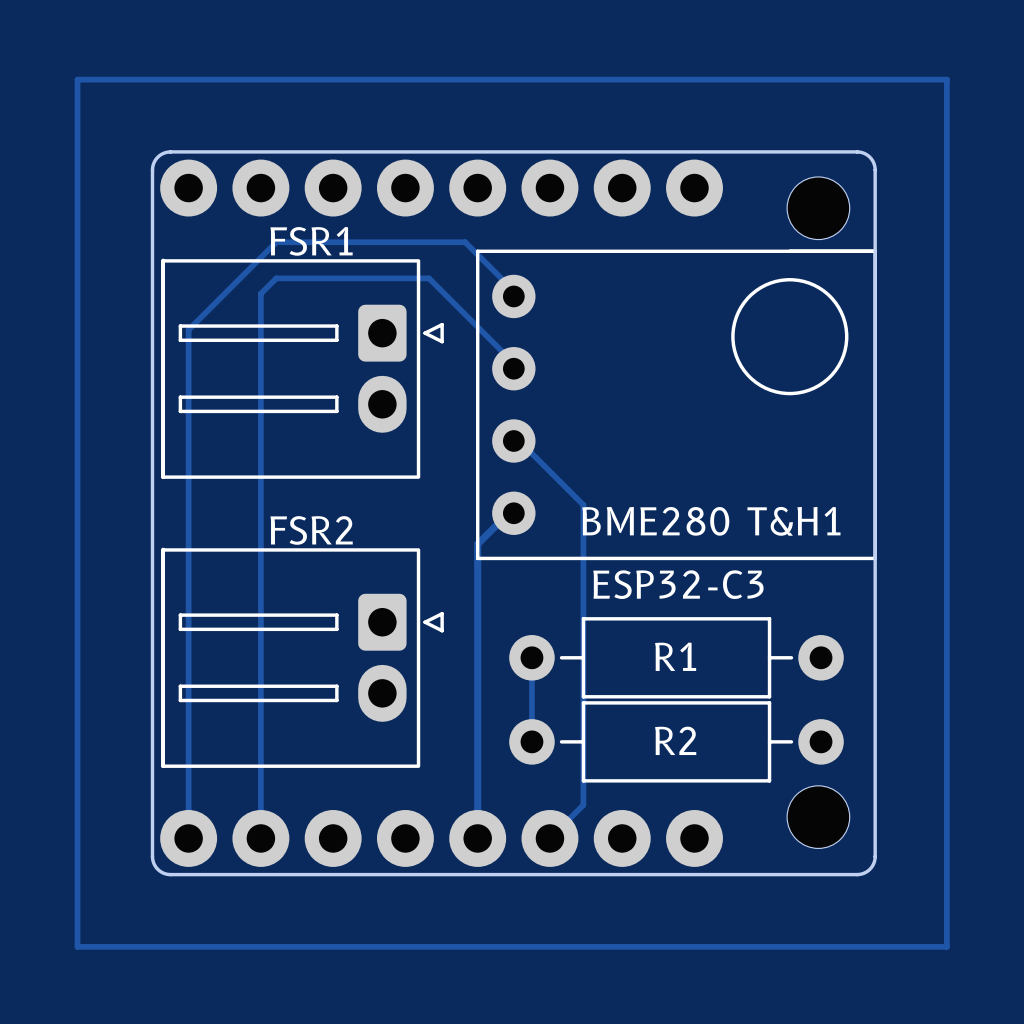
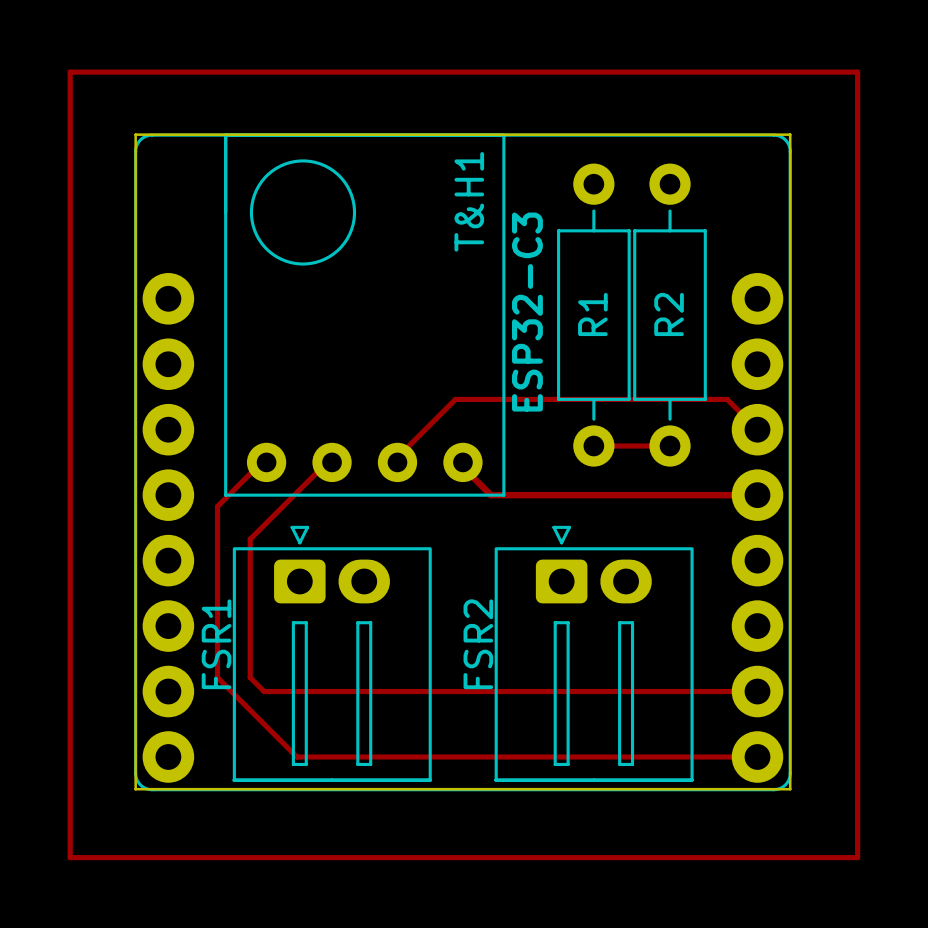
board edge: none -> (135, 134) (135, 789) (790, 789) (790, 134) (135, 134)
ESP32-C3 footprint: [150, 150, 877, 877] -> [134, 133, 792, 792]
part: (818, 208) -> none
track: (513, 291) (465, 242) (276, 242) (188, 329) (188, 838) -> none
T&H1: none -> (364, 315)
track: (513, 363) (429, 278) (276, 278) (260, 293) (260, 838) -> none
FSR1 rotation: 0° (302, 368) -> 90° counterclockwise (332, 653)
FSR1 position: (302, 368) -> (332, 653)
BME280 T&H1: (676, 404) -> none
track: (513, 435) (583, 505) (583, 805) (549, 838) -> none
track: none -> (757, 429) (727, 399) (455, 399) (392, 462)
track: none -> (593, 446) (670, 446)
track: (513, 507) (477, 544) (477, 838) -> none
track: none -> (261, 462) (217, 506) (217, 677) (296, 756) (757, 756)
track: none -> (327, 462) (250, 539) (250, 677) (264, 691) (757, 691)
track: none -> (458, 462) (490, 495) (757, 495)
ESP32-C3 name position: ESP32-C3 (678, 584) -> ESP32-C3 (527, 312)
FSR2 rotation: 0° (302, 657) -> 90° counterclockwise (593, 653)
FSR2 position: (302, 657) -> (593, 653)
track: (531, 657) (531, 741) -> none
R1 rotation: 0° (676, 657) -> 90° clockwise (593, 315)
R1 position: (676, 657) -> (593, 315)
R2 rotation: 0° (676, 741) -> 90° clockwise (670, 315)
R2 position: (676, 741) -> (670, 315)
part: (818, 817) -> none

